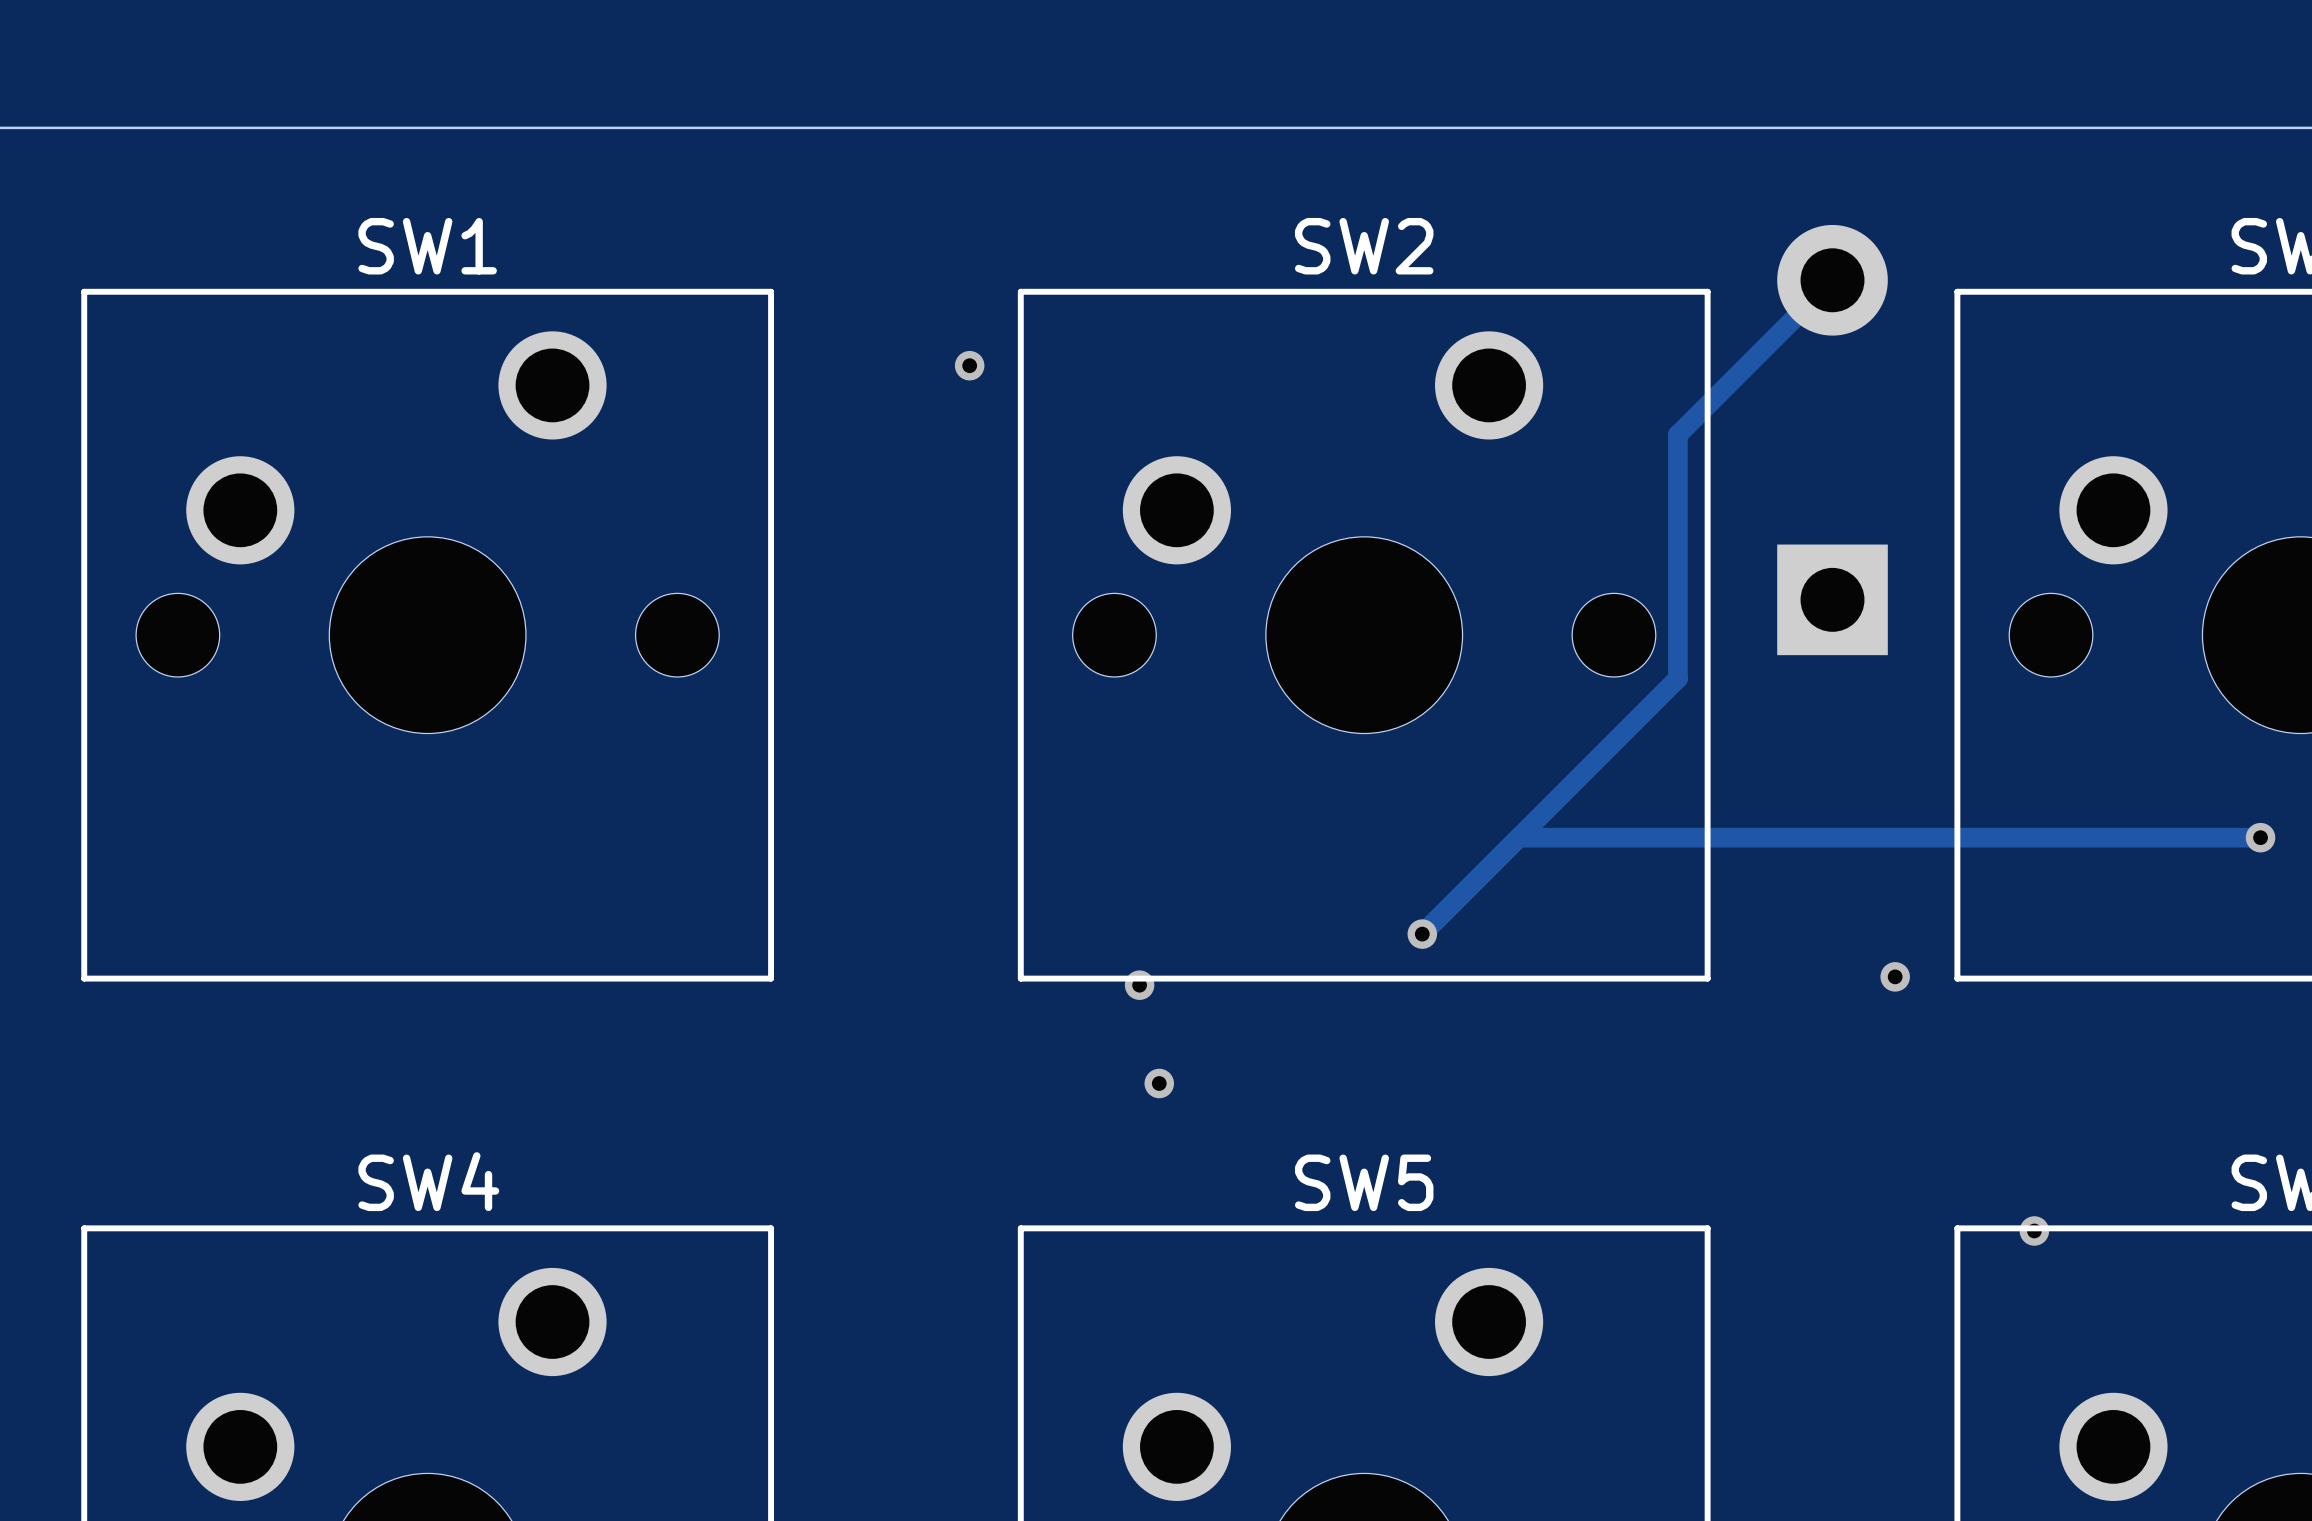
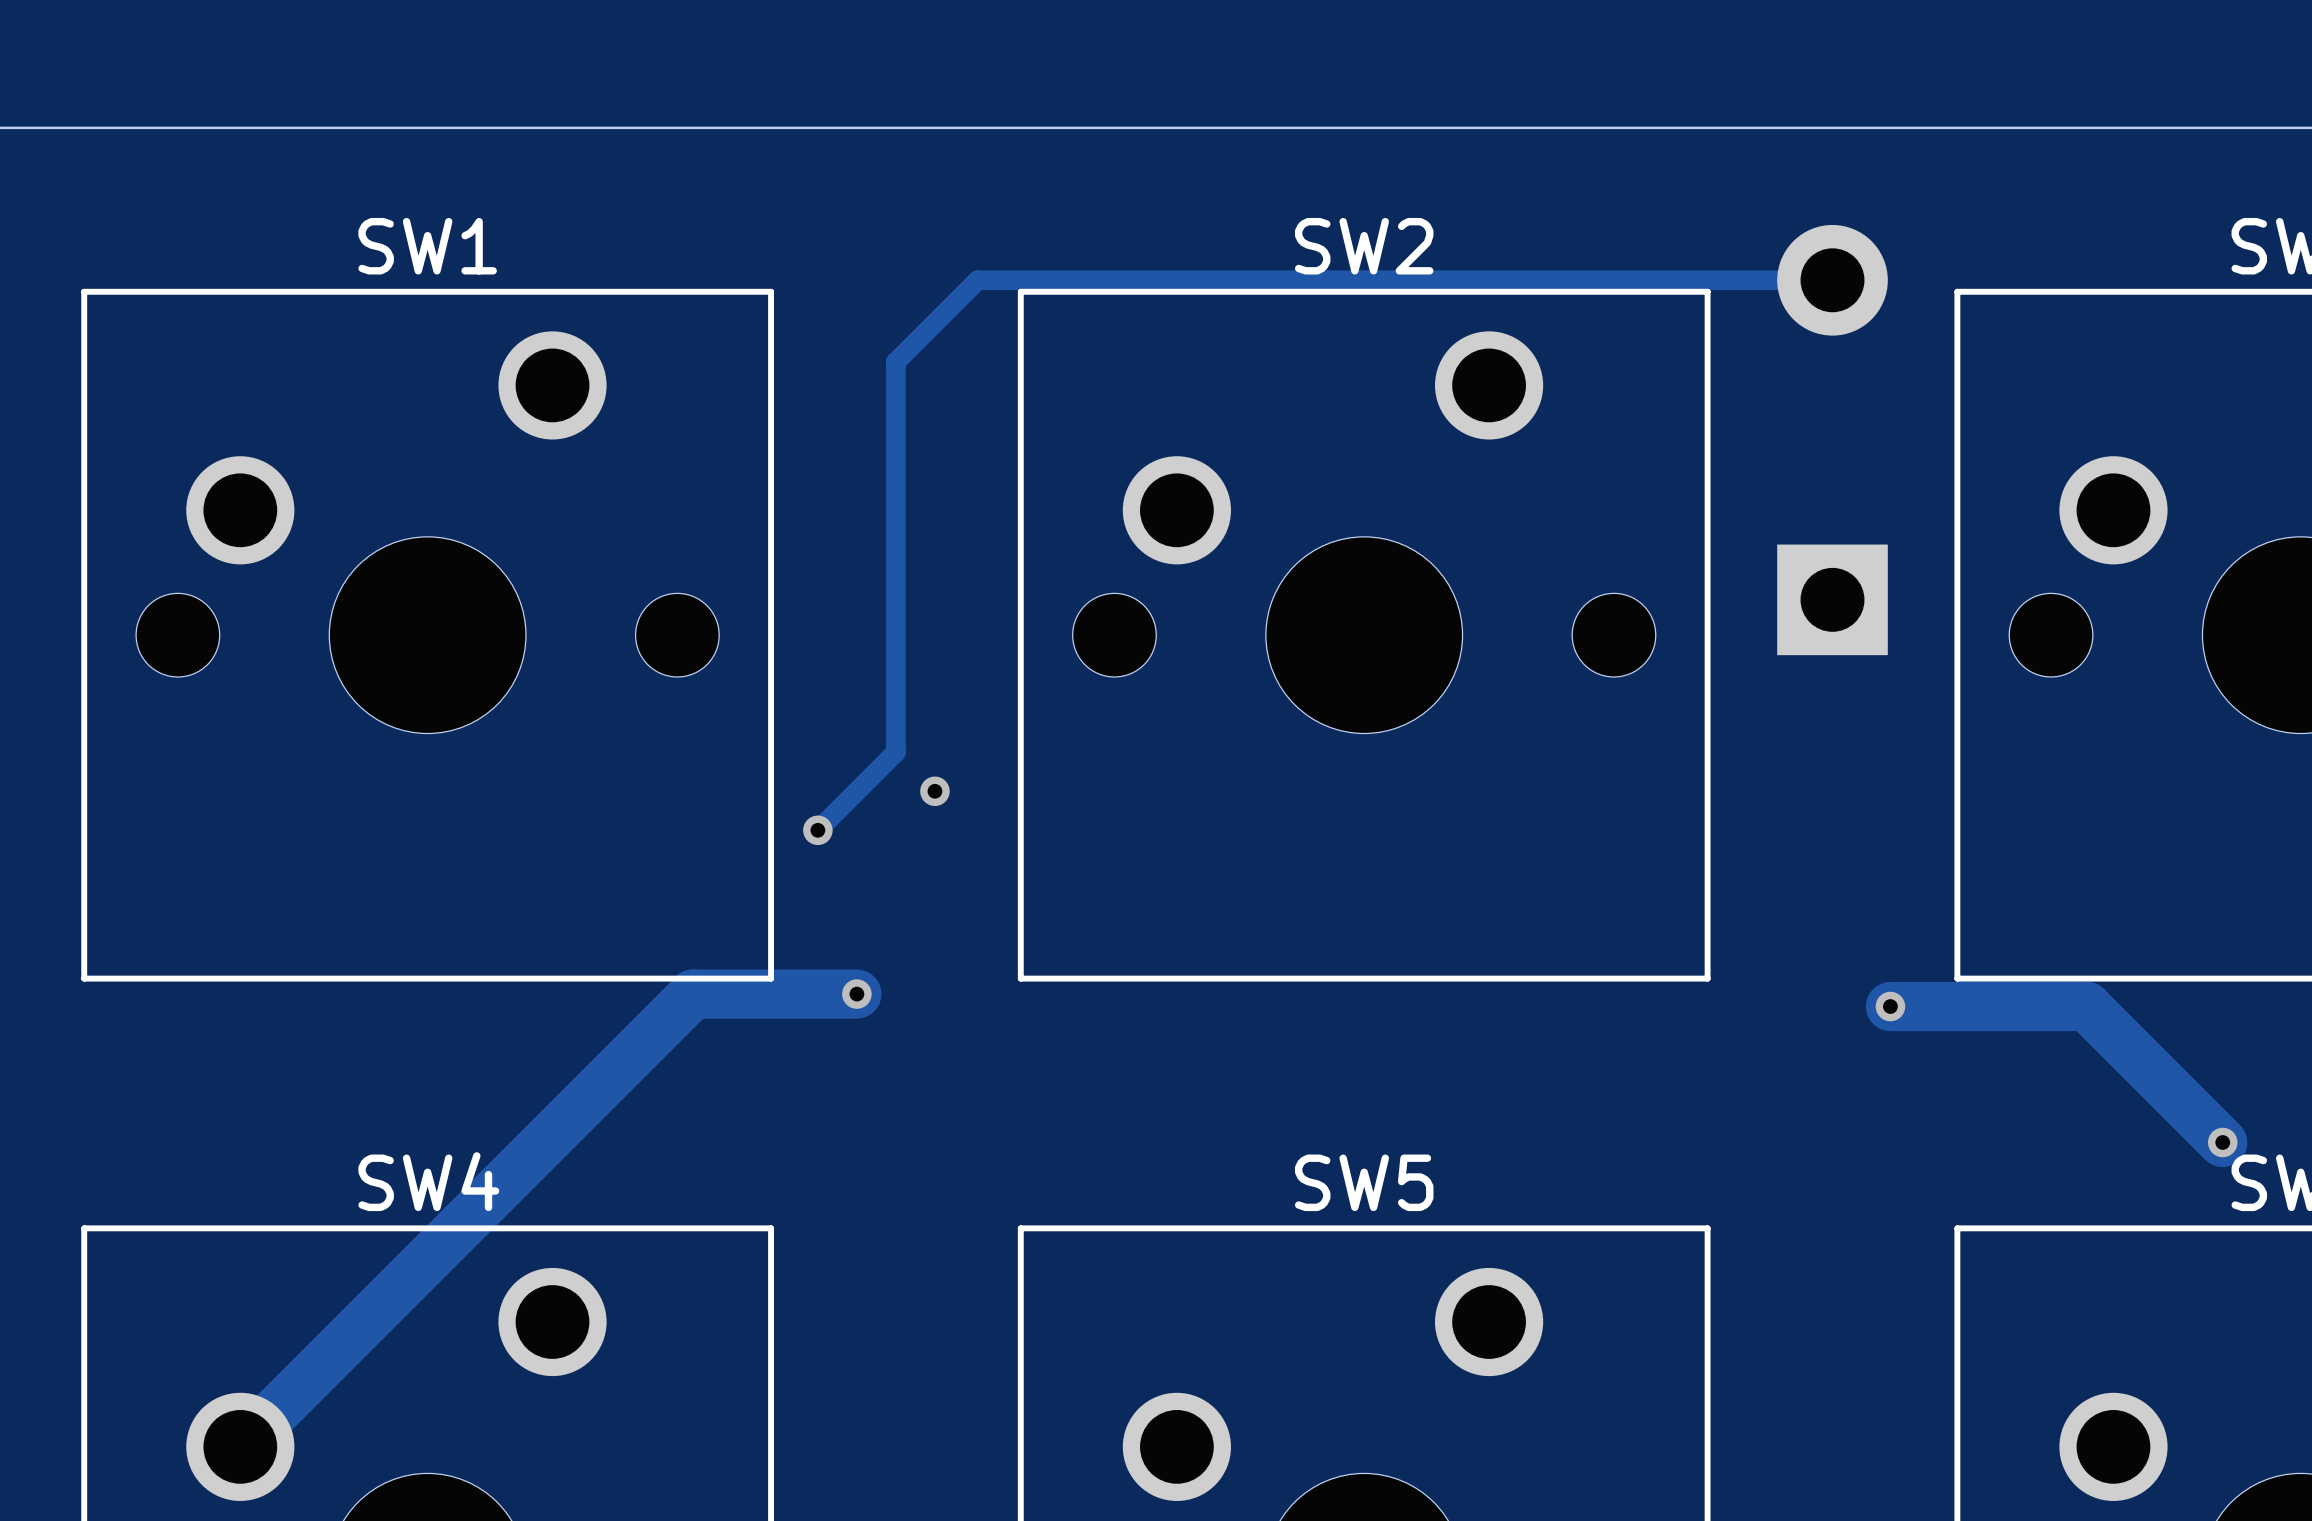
track: (1832, 280) (1677, 434) (1677, 678) (1422, 934) -> (1832, 280) (977, 280) (895, 362) (895, 752) (817, 830)
via: (969, 365) -> none
via: none -> (934, 791)
via: none -> (817, 830)
track: (1518, 837) (2260, 837) -> none
via: (2260, 837) -> none
via: (1422, 934) -> none
via position: (1895, 976) -> (1890, 1006)
via: (1139, 985) -> none
track: none -> (856, 994) (693, 994) (240, 1446)
via: none -> (856, 994)
track: none -> (1890, 1006) (2086, 1006) (2222, 1142)
via: (1159, 1083) -> none
via: none -> (2222, 1142)
via: (2034, 1230) -> none

